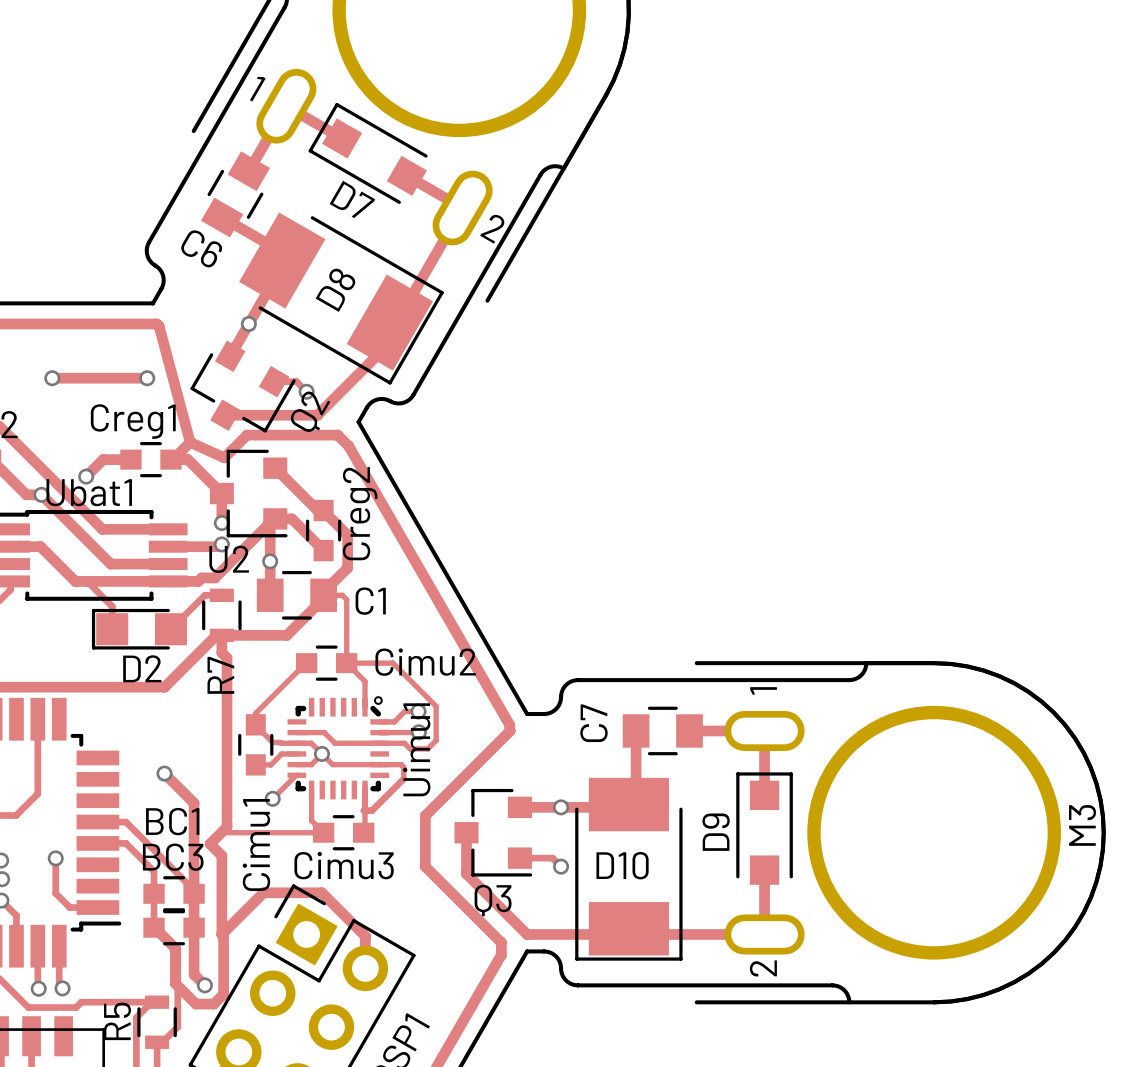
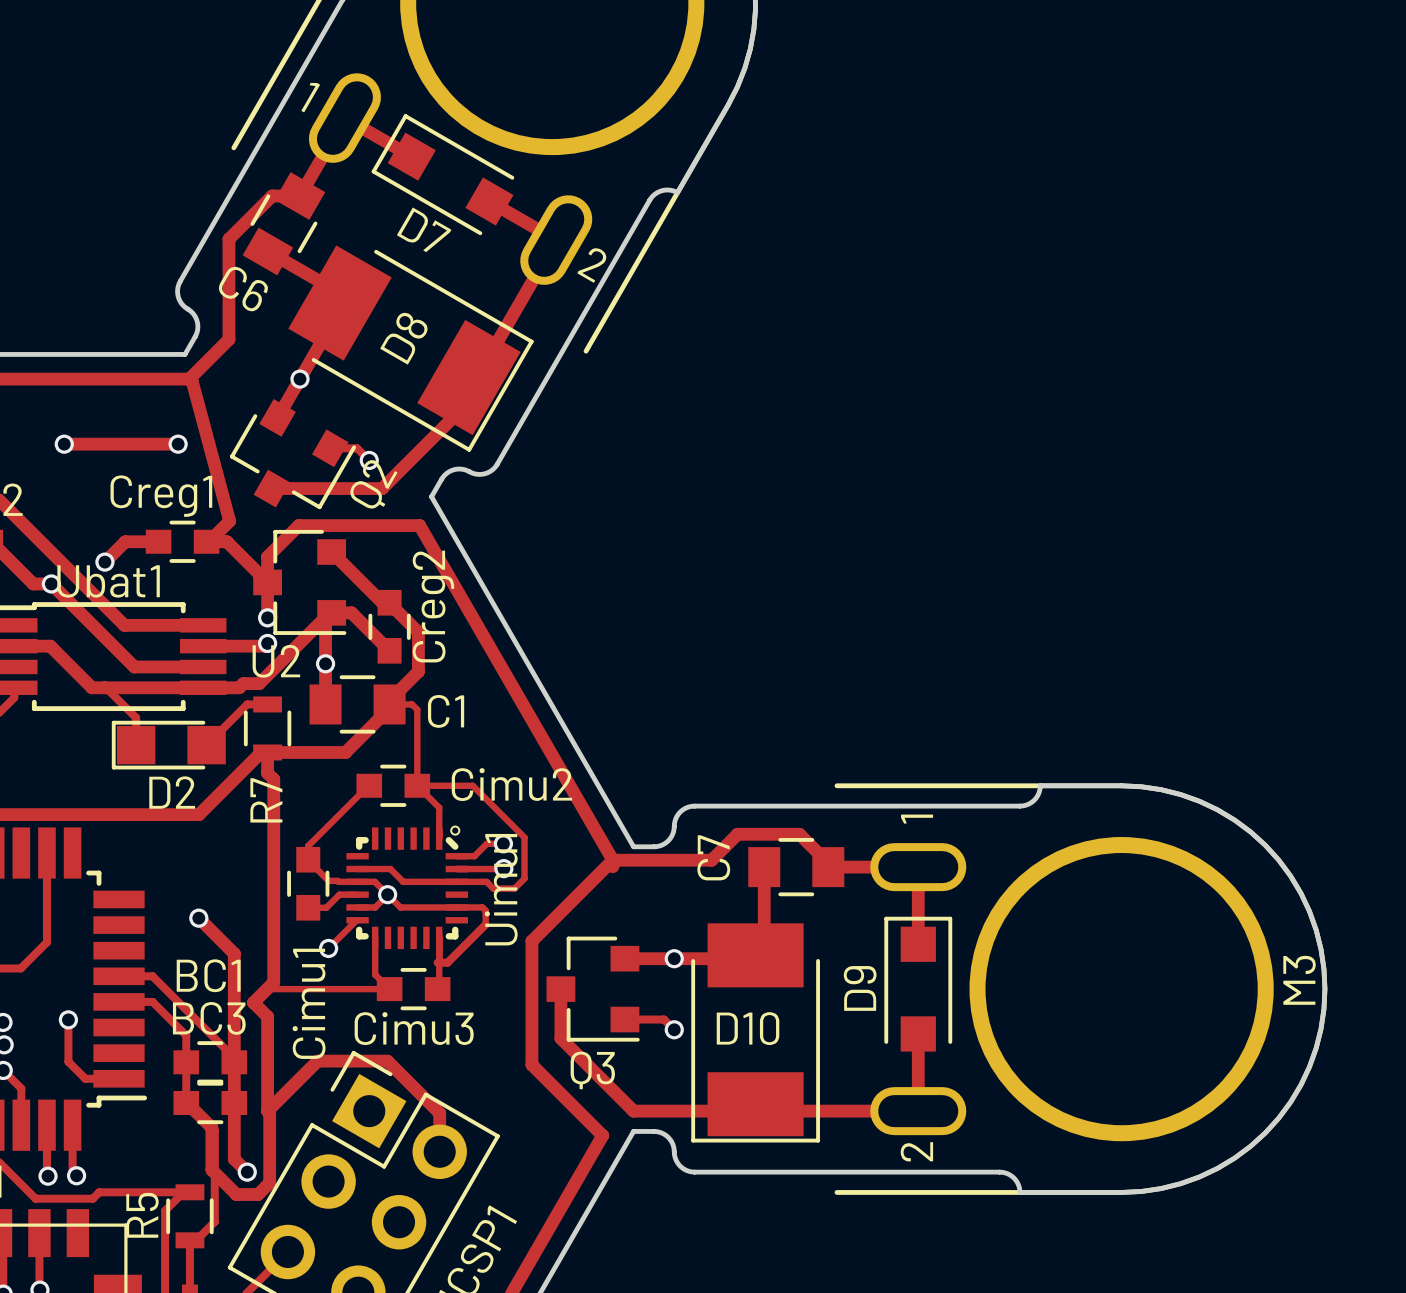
track: none -> (299, 196) (272, 196) (228, 239) (228, 339) (189, 379)
track: (190, 442) (224, 457) (247, 435) (337, 435) (348, 446) -> (267, 582) (267, 556) (298, 525) (419, 525)
track: (510, 730) (425, 815) (425, 866) (501, 942) (501, 954) -> (828, 867) (828, 863) (799, 834) (737, 834) (711, 860) (612, 860) (531, 941) (531, 1064) (602, 1135)
board edge: none -> (1019, 1192) (1121, 1192)

